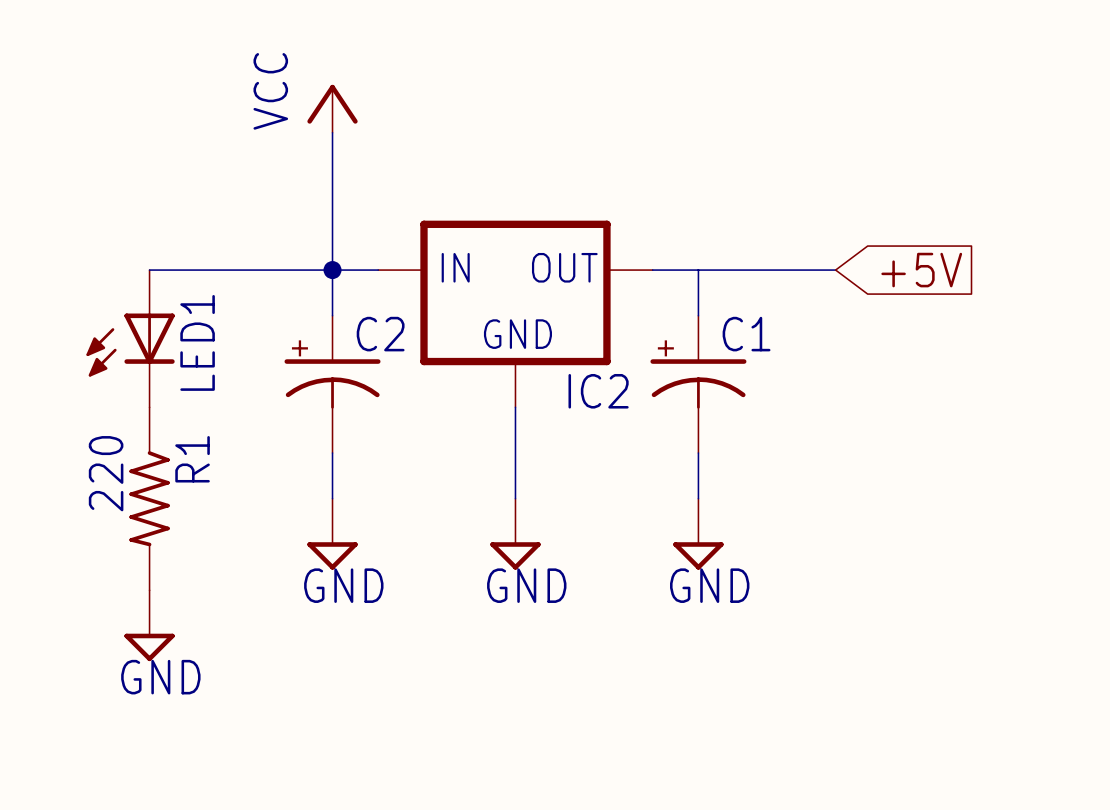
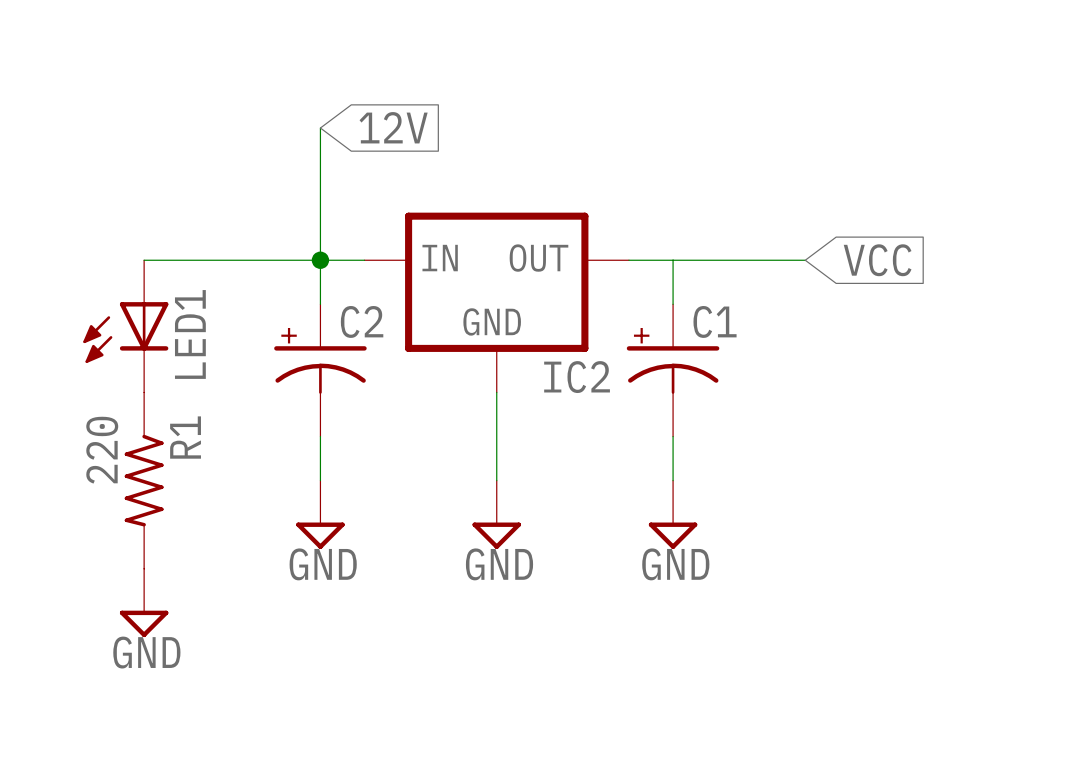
power symbol: VCC (332, 108) -> none
global label: none -> 12V (393, 127)
global label: +5V (921, 270) -> VCC (877, 260)

